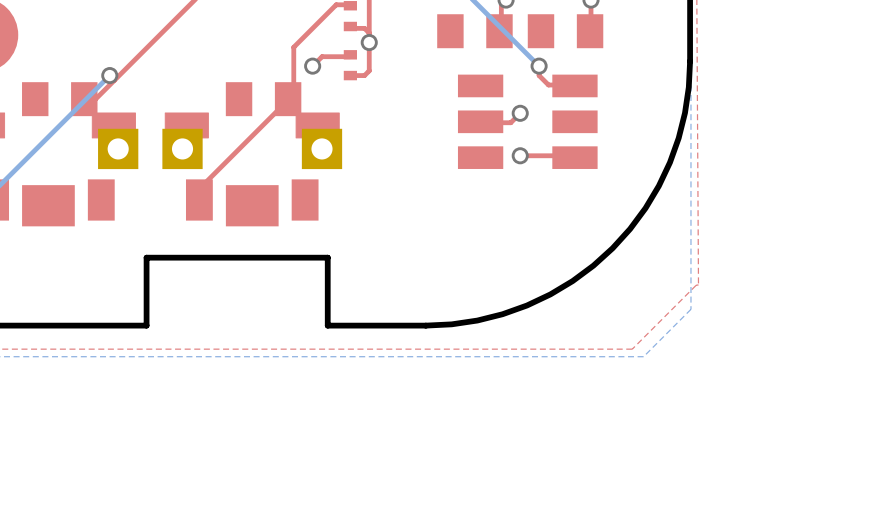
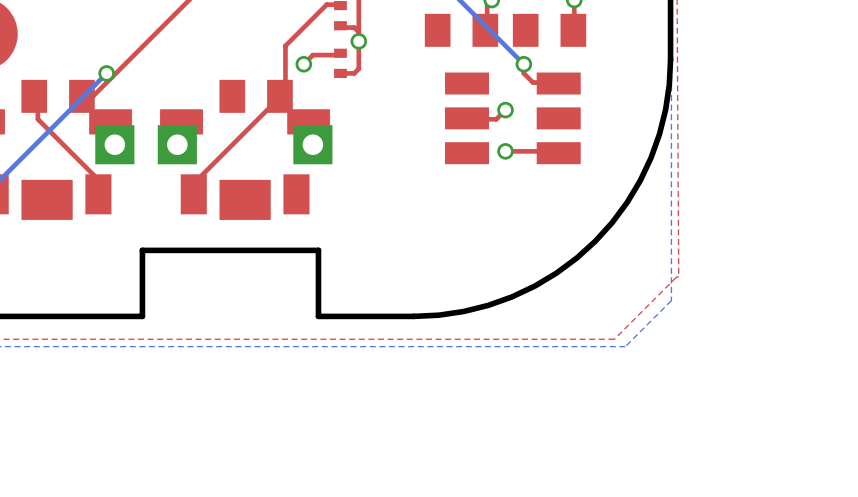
top track: none -> (34, 96) (37, 96) (37, 119) (97, 178) (98, 194)

